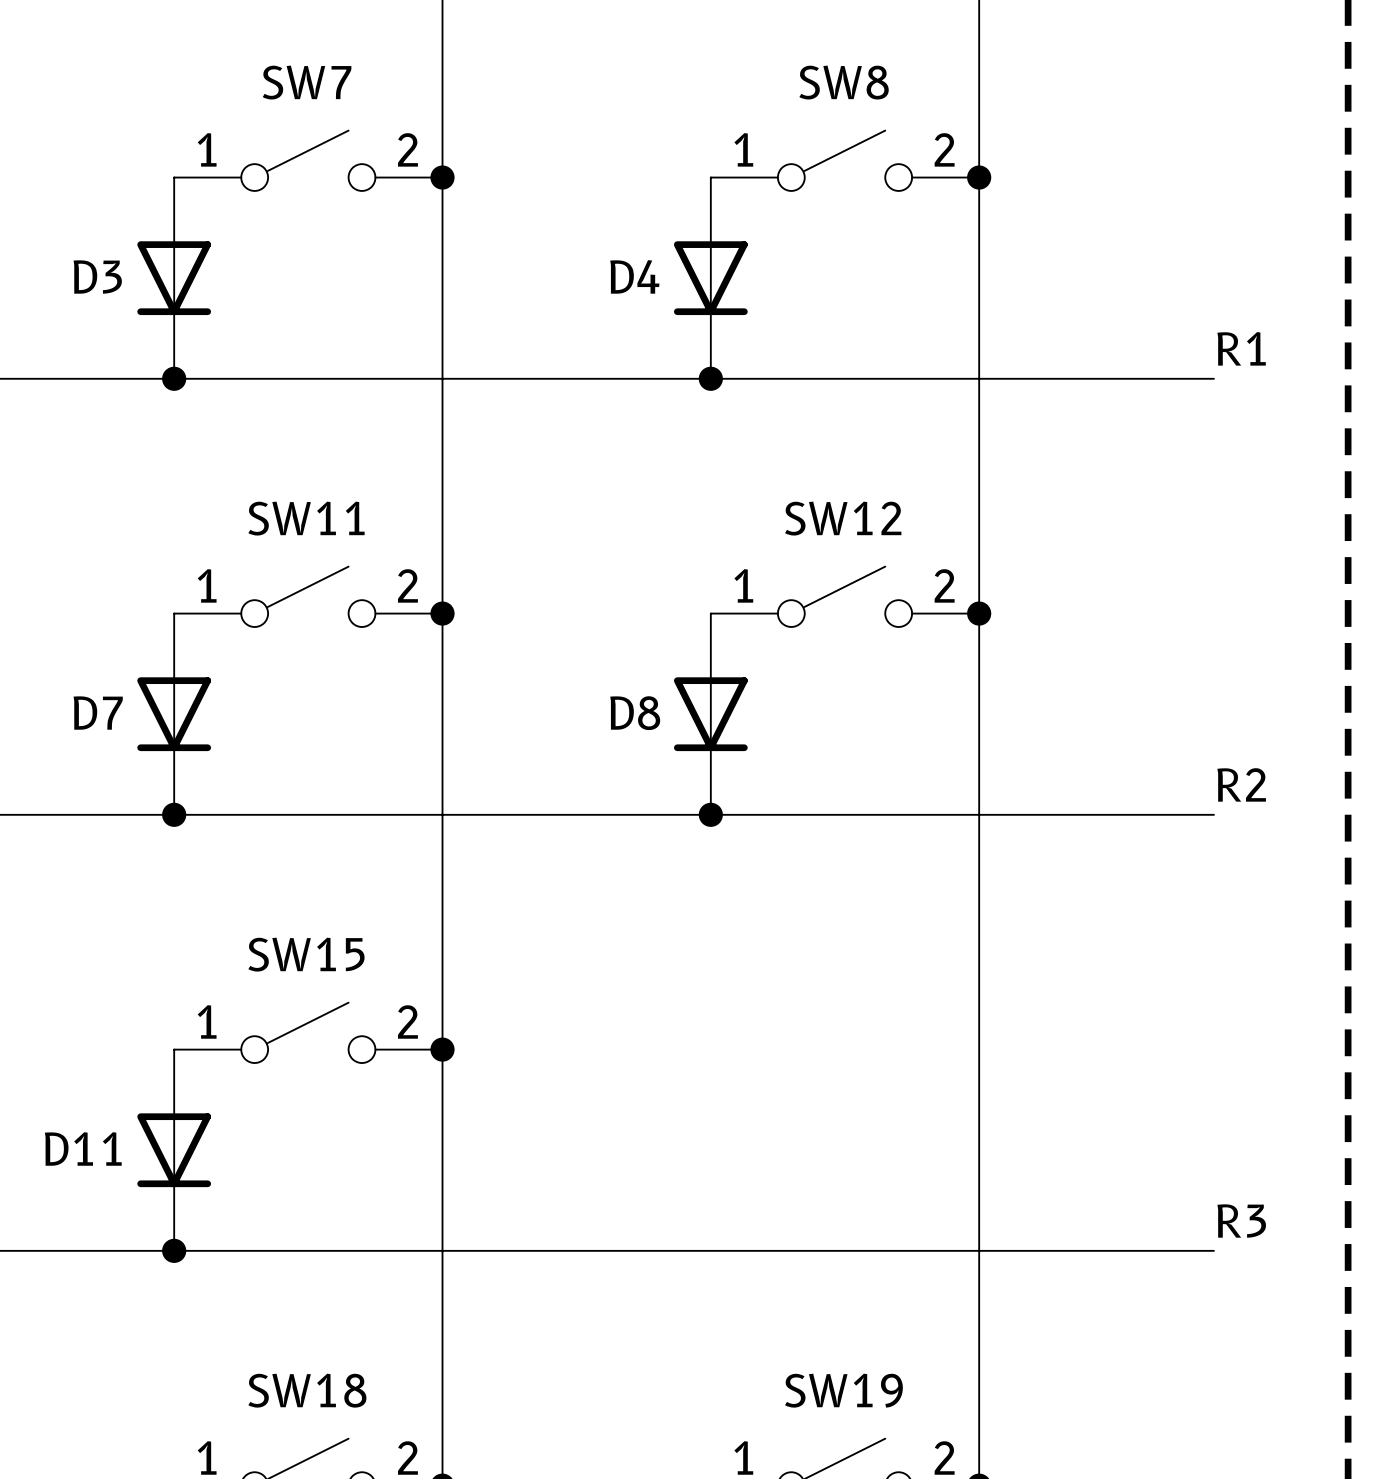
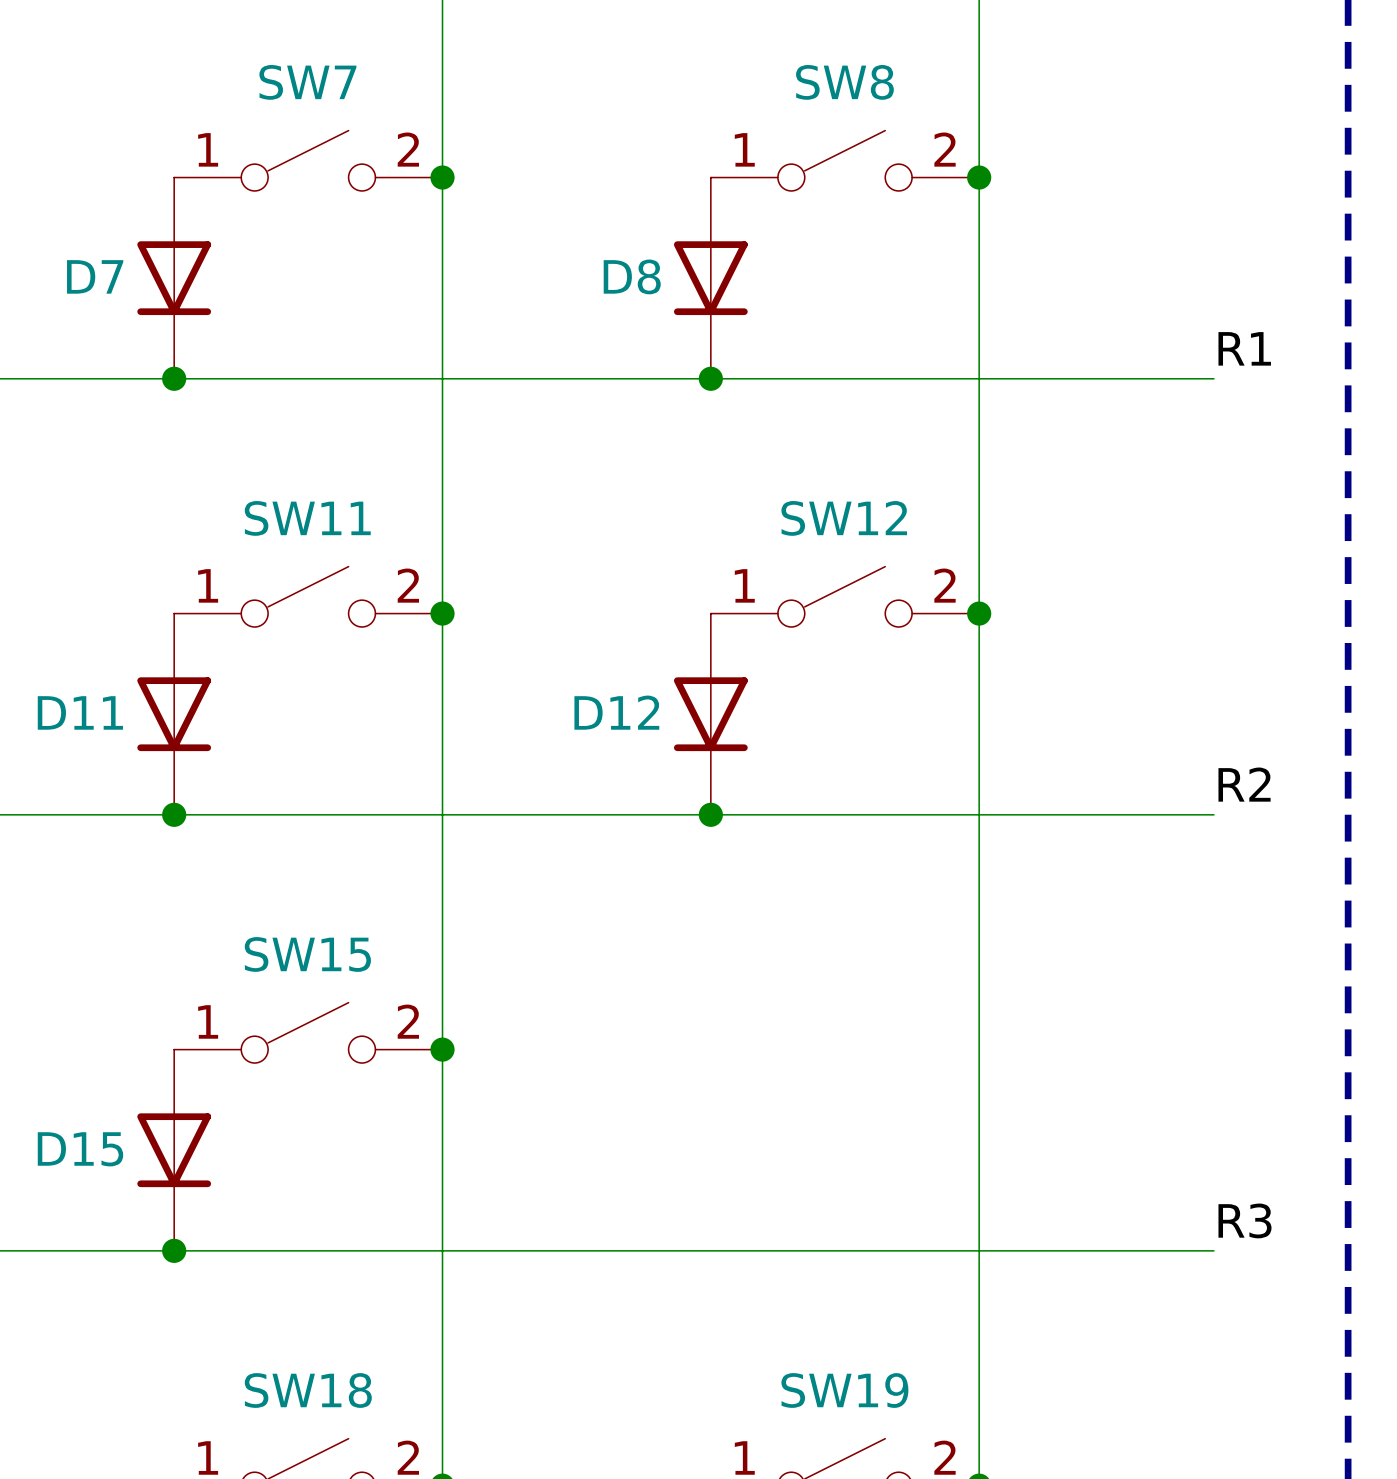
D4 name: D4 (634, 276) -> D8 (632, 276)
D3 name: D3 (97, 277) -> D7 (95, 276)
D7 name: D7 (98, 713) -> D11 (80, 712)
D8 name: D8 (635, 713) -> D12 (616, 712)
D11 name: D11 (83, 1148) -> D15 (80, 1149)

